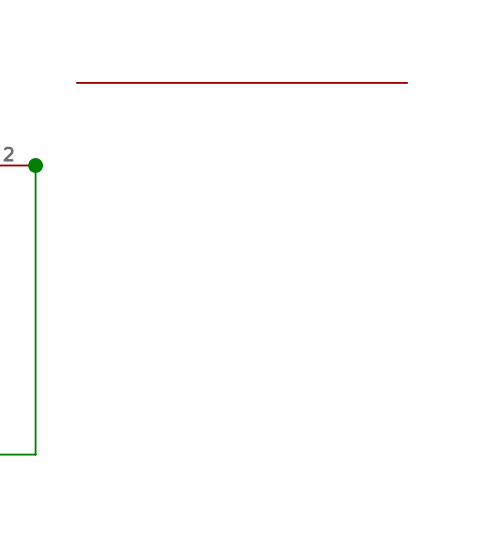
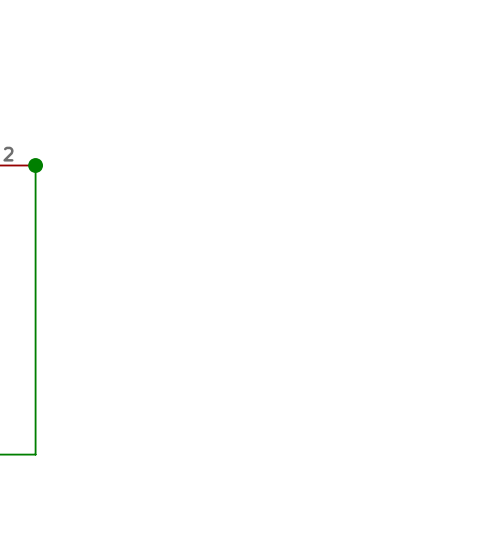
part: (242, 82) -> none

